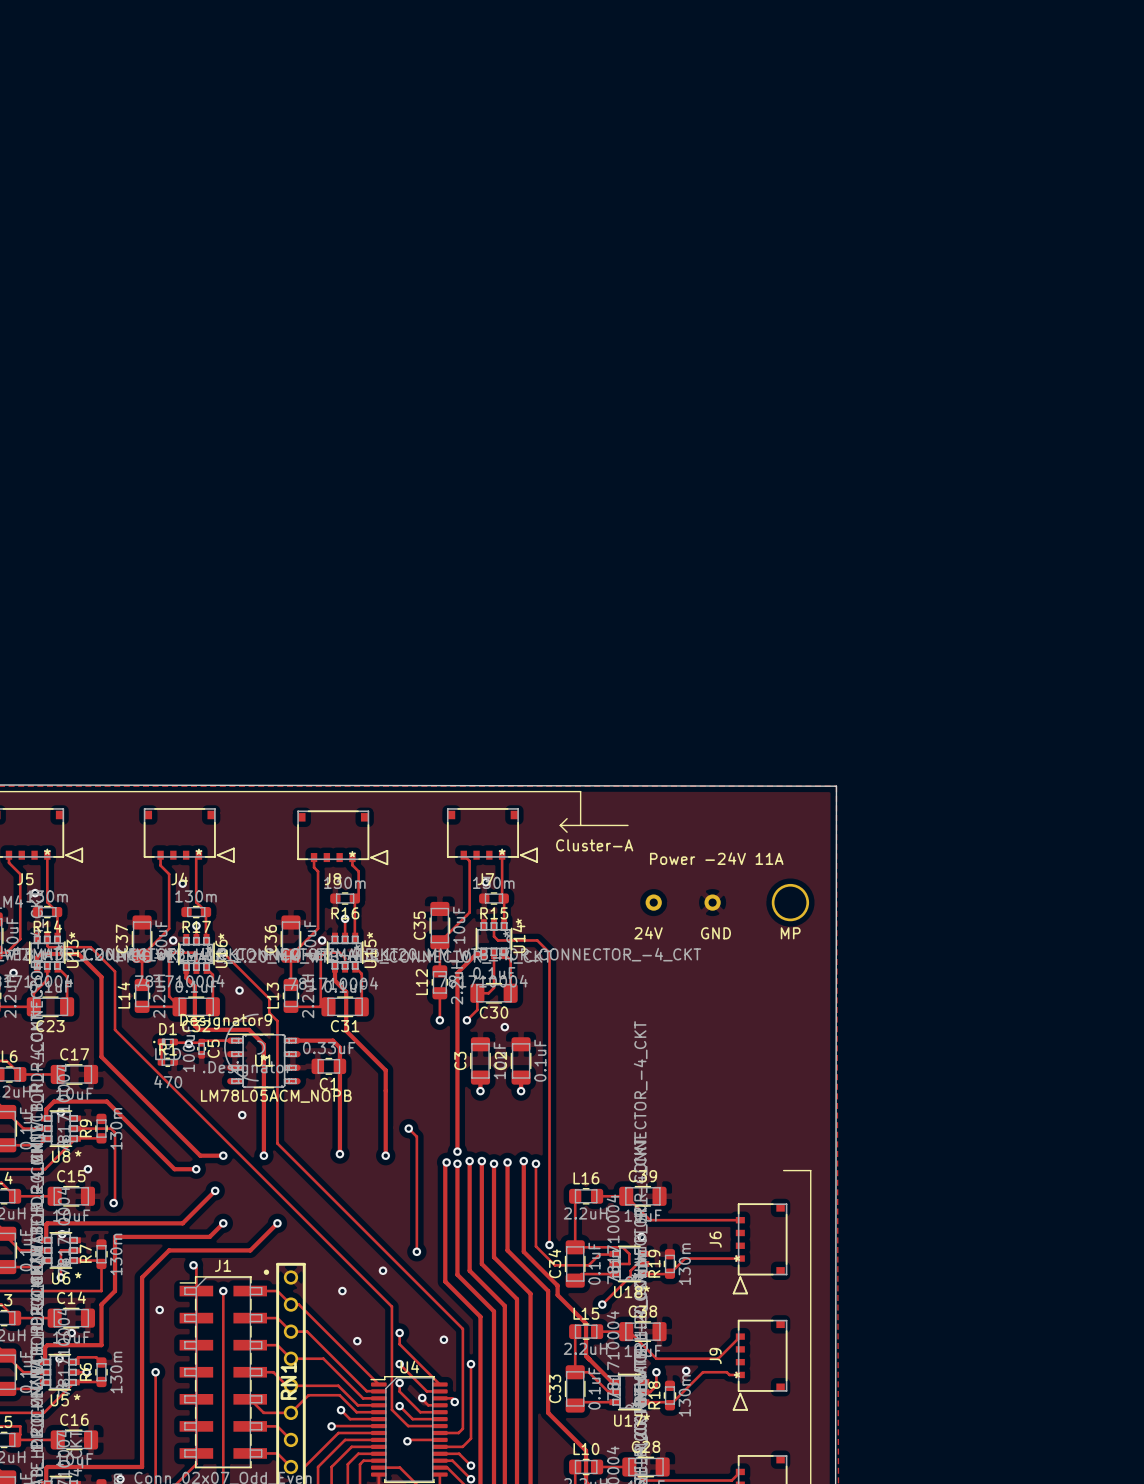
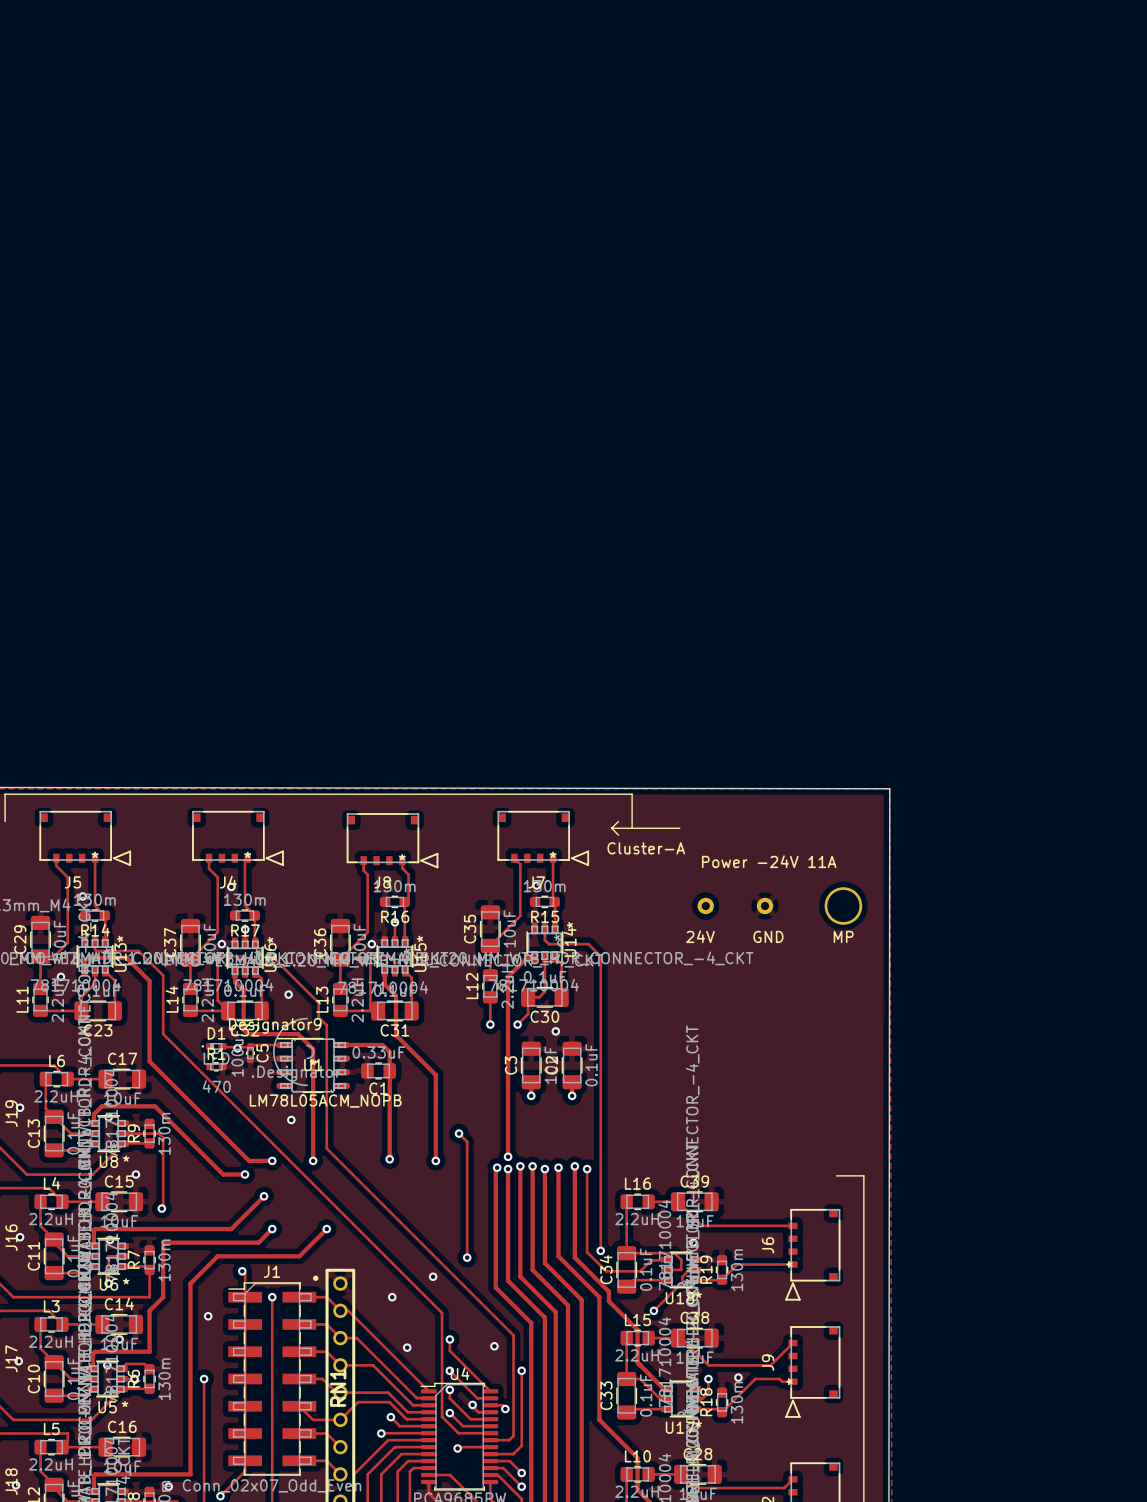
track: (161, 1041) (161, 1062) -> none

